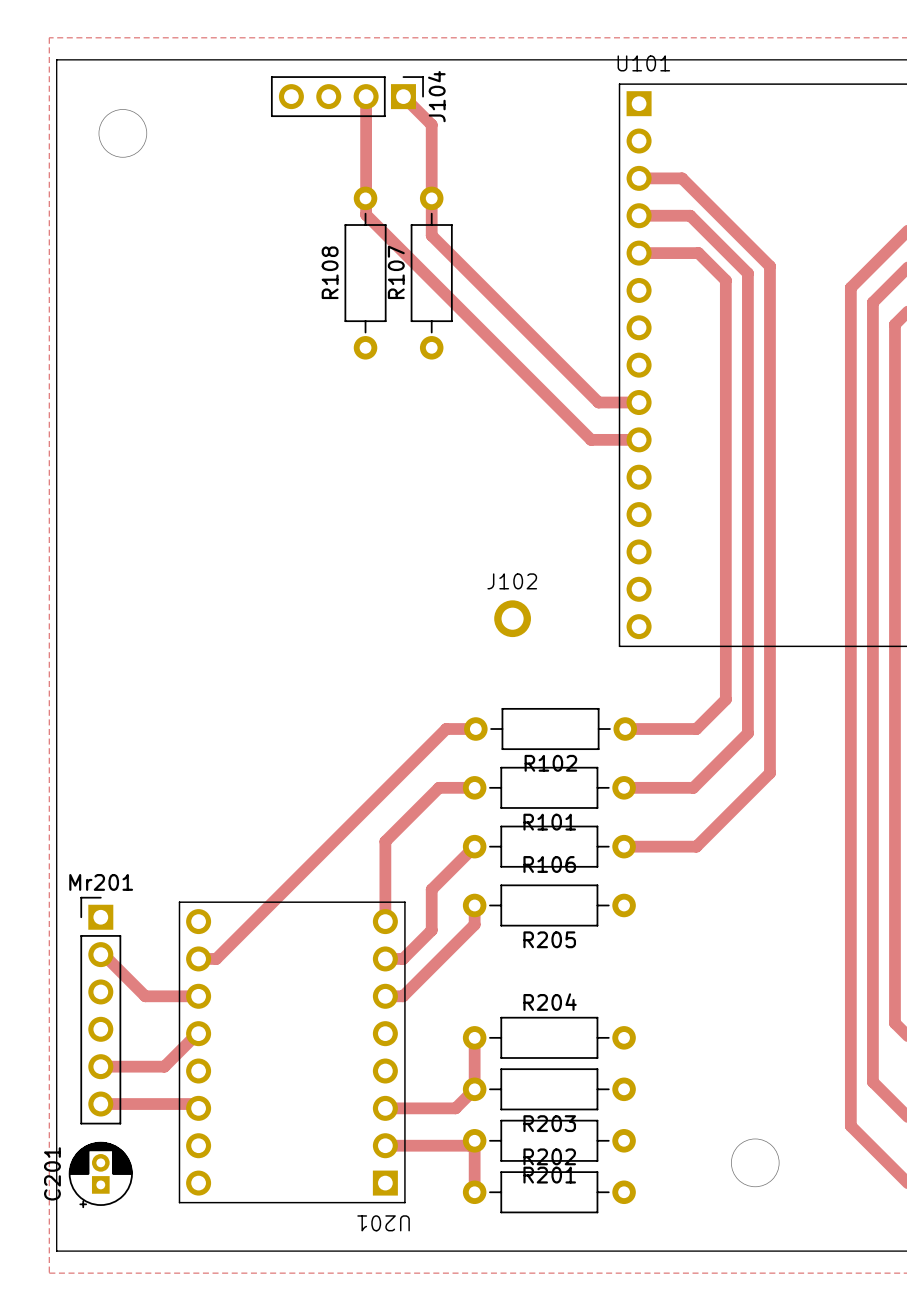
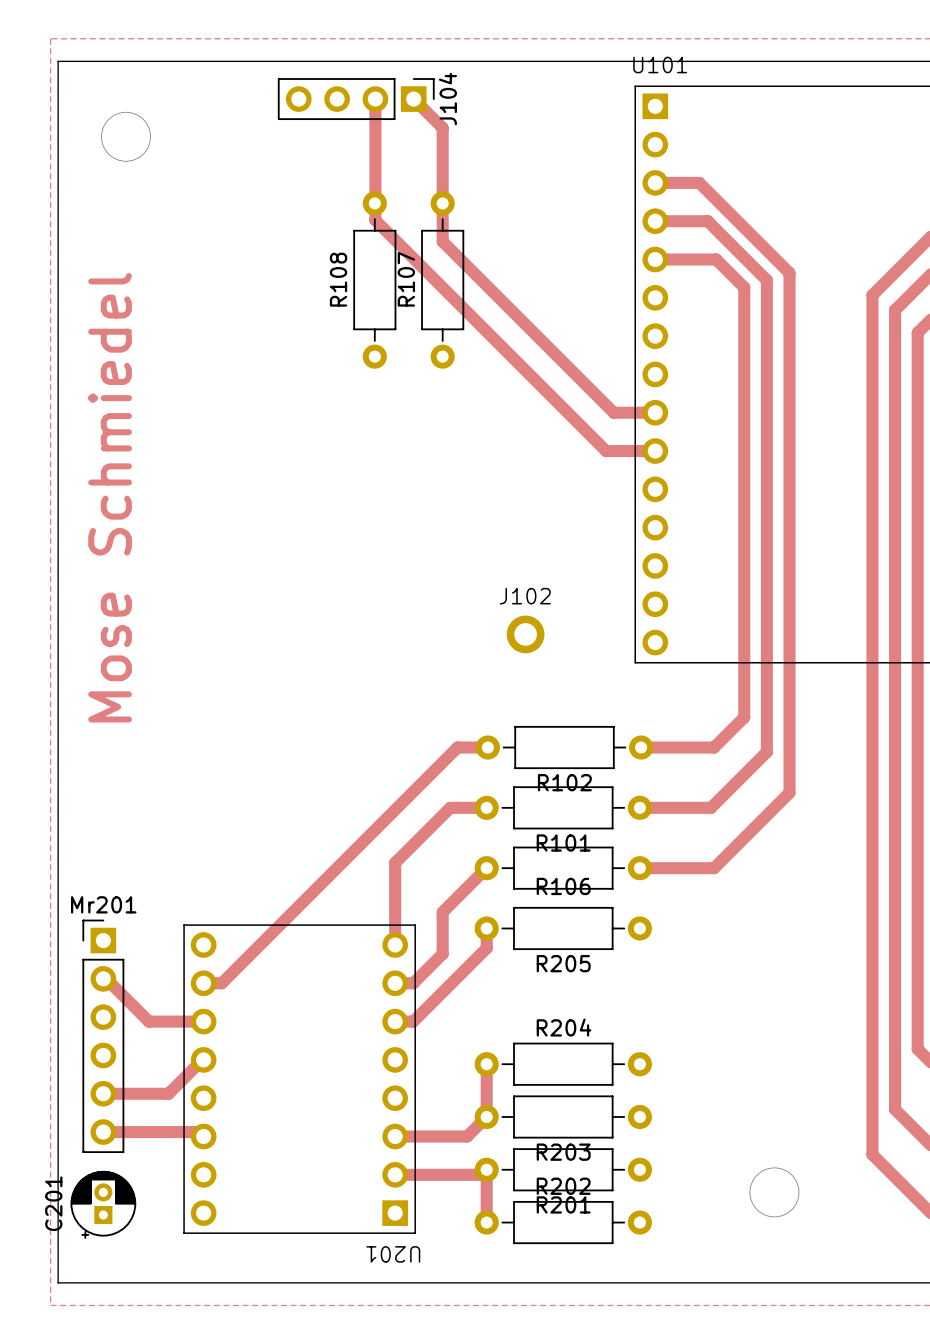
text: none -> Mose Schmiedel (110, 497)

